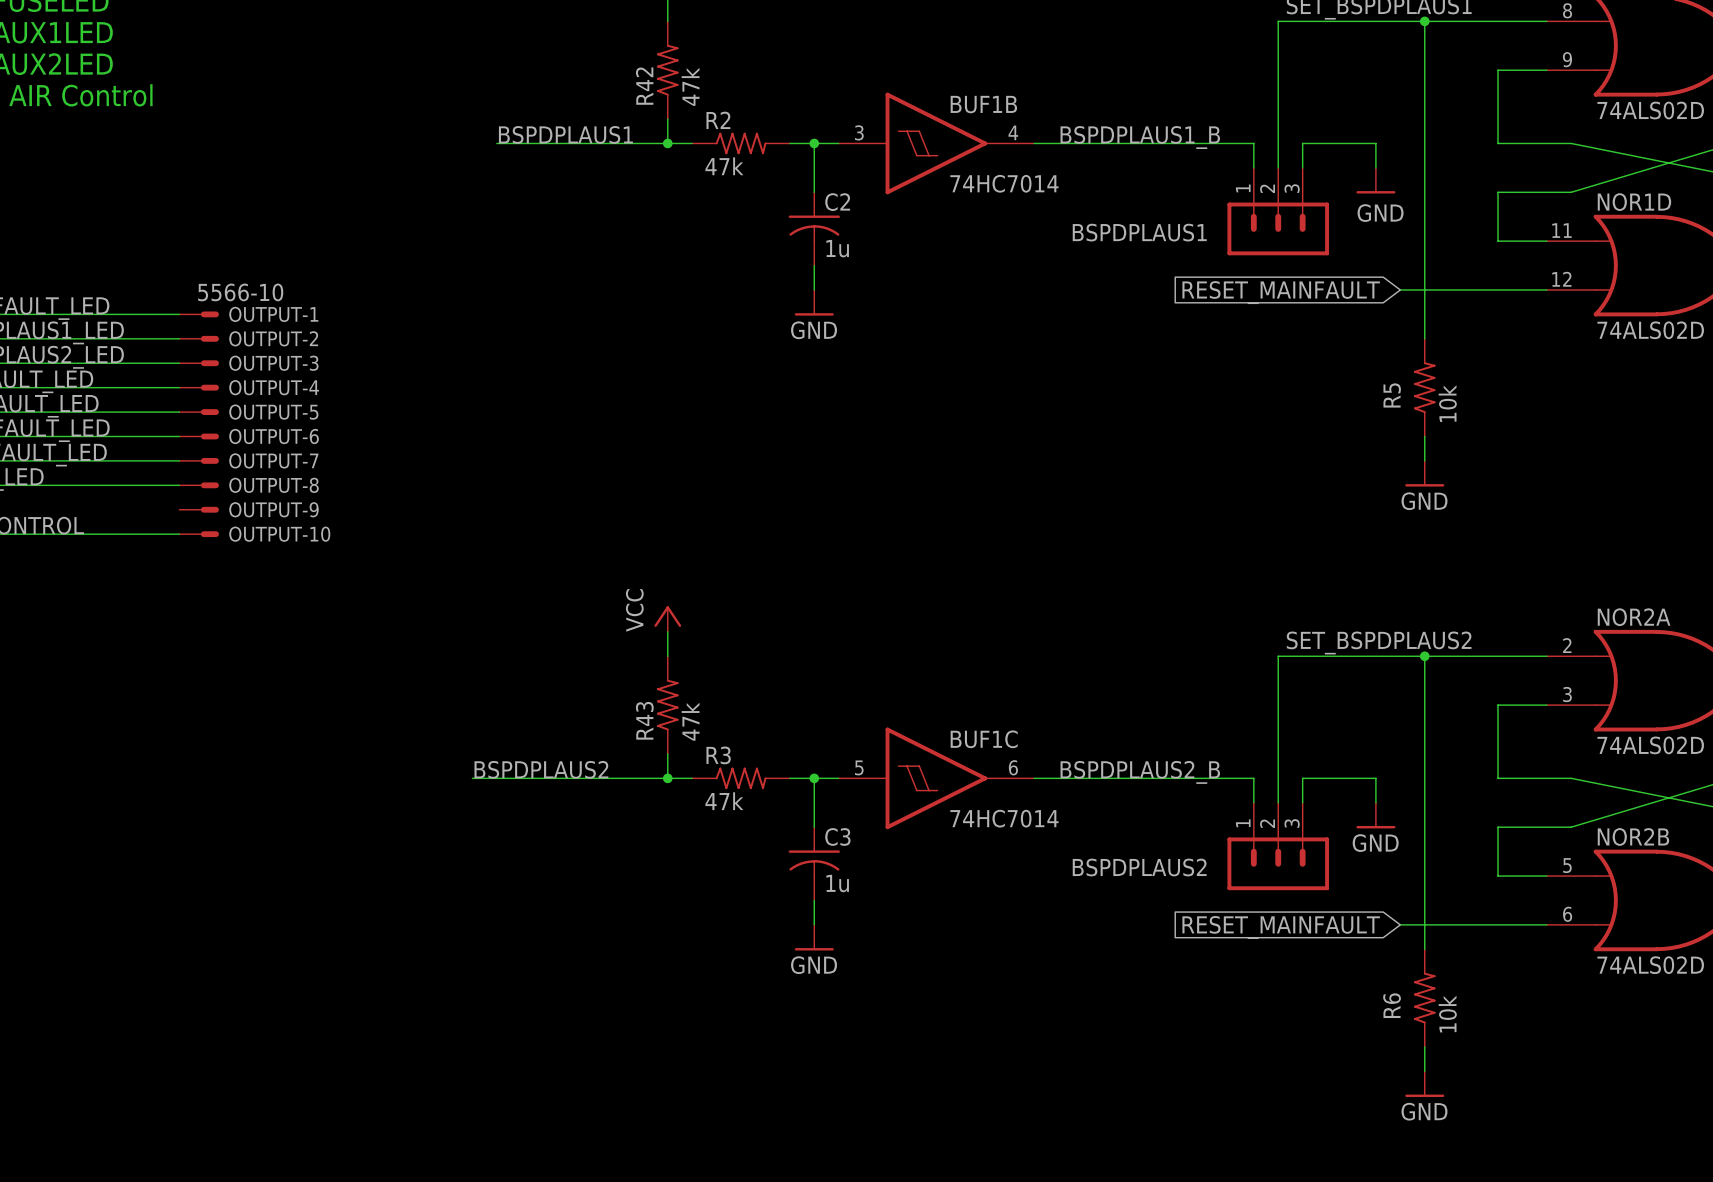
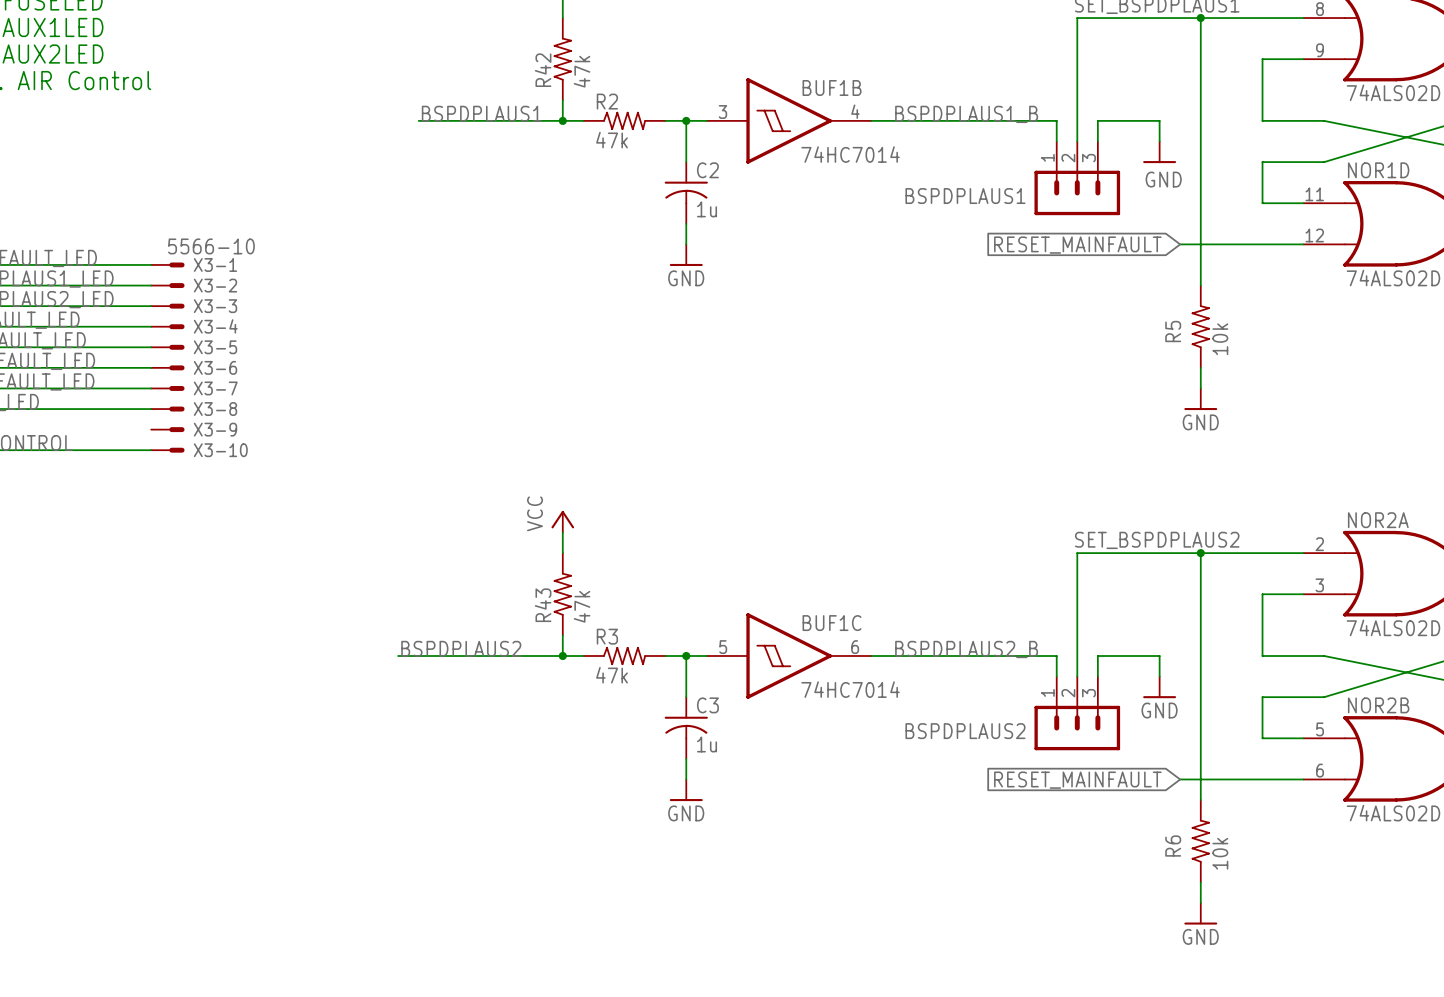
OUTPUT-1 name: OUTPUT-1 (273, 314) -> X3-1 (215, 264)
OUTPUT-2 name: OUTPUT-2 (273, 338) -> X3-2 (215, 285)
OUTPUT-3 name: OUTPUT-3 (273, 363) -> X3-3 (215, 306)
OUTPUT-4 name: OUTPUT-4 (274, 387) -> X3-4 (215, 326)
OUTPUT-5 name: OUTPUT-5 (273, 412) -> X3-5 (215, 347)
OUTPUT-6 name: OUTPUT-6 (274, 436) -> X3-6 (215, 367)
OUTPUT-7 name: OUTPUT-7 (273, 460) -> X3-7 (215, 388)
OUTPUT-8 name: OUTPUT-8 (273, 485) -> X3-8 (215, 409)
OUTPUT-9 name: OUTPUT-9 (273, 509) -> X3-9 (215, 429)
OUTPUT-10 name: OUTPUT-10 (279, 534) -> X3-10 (220, 450)

